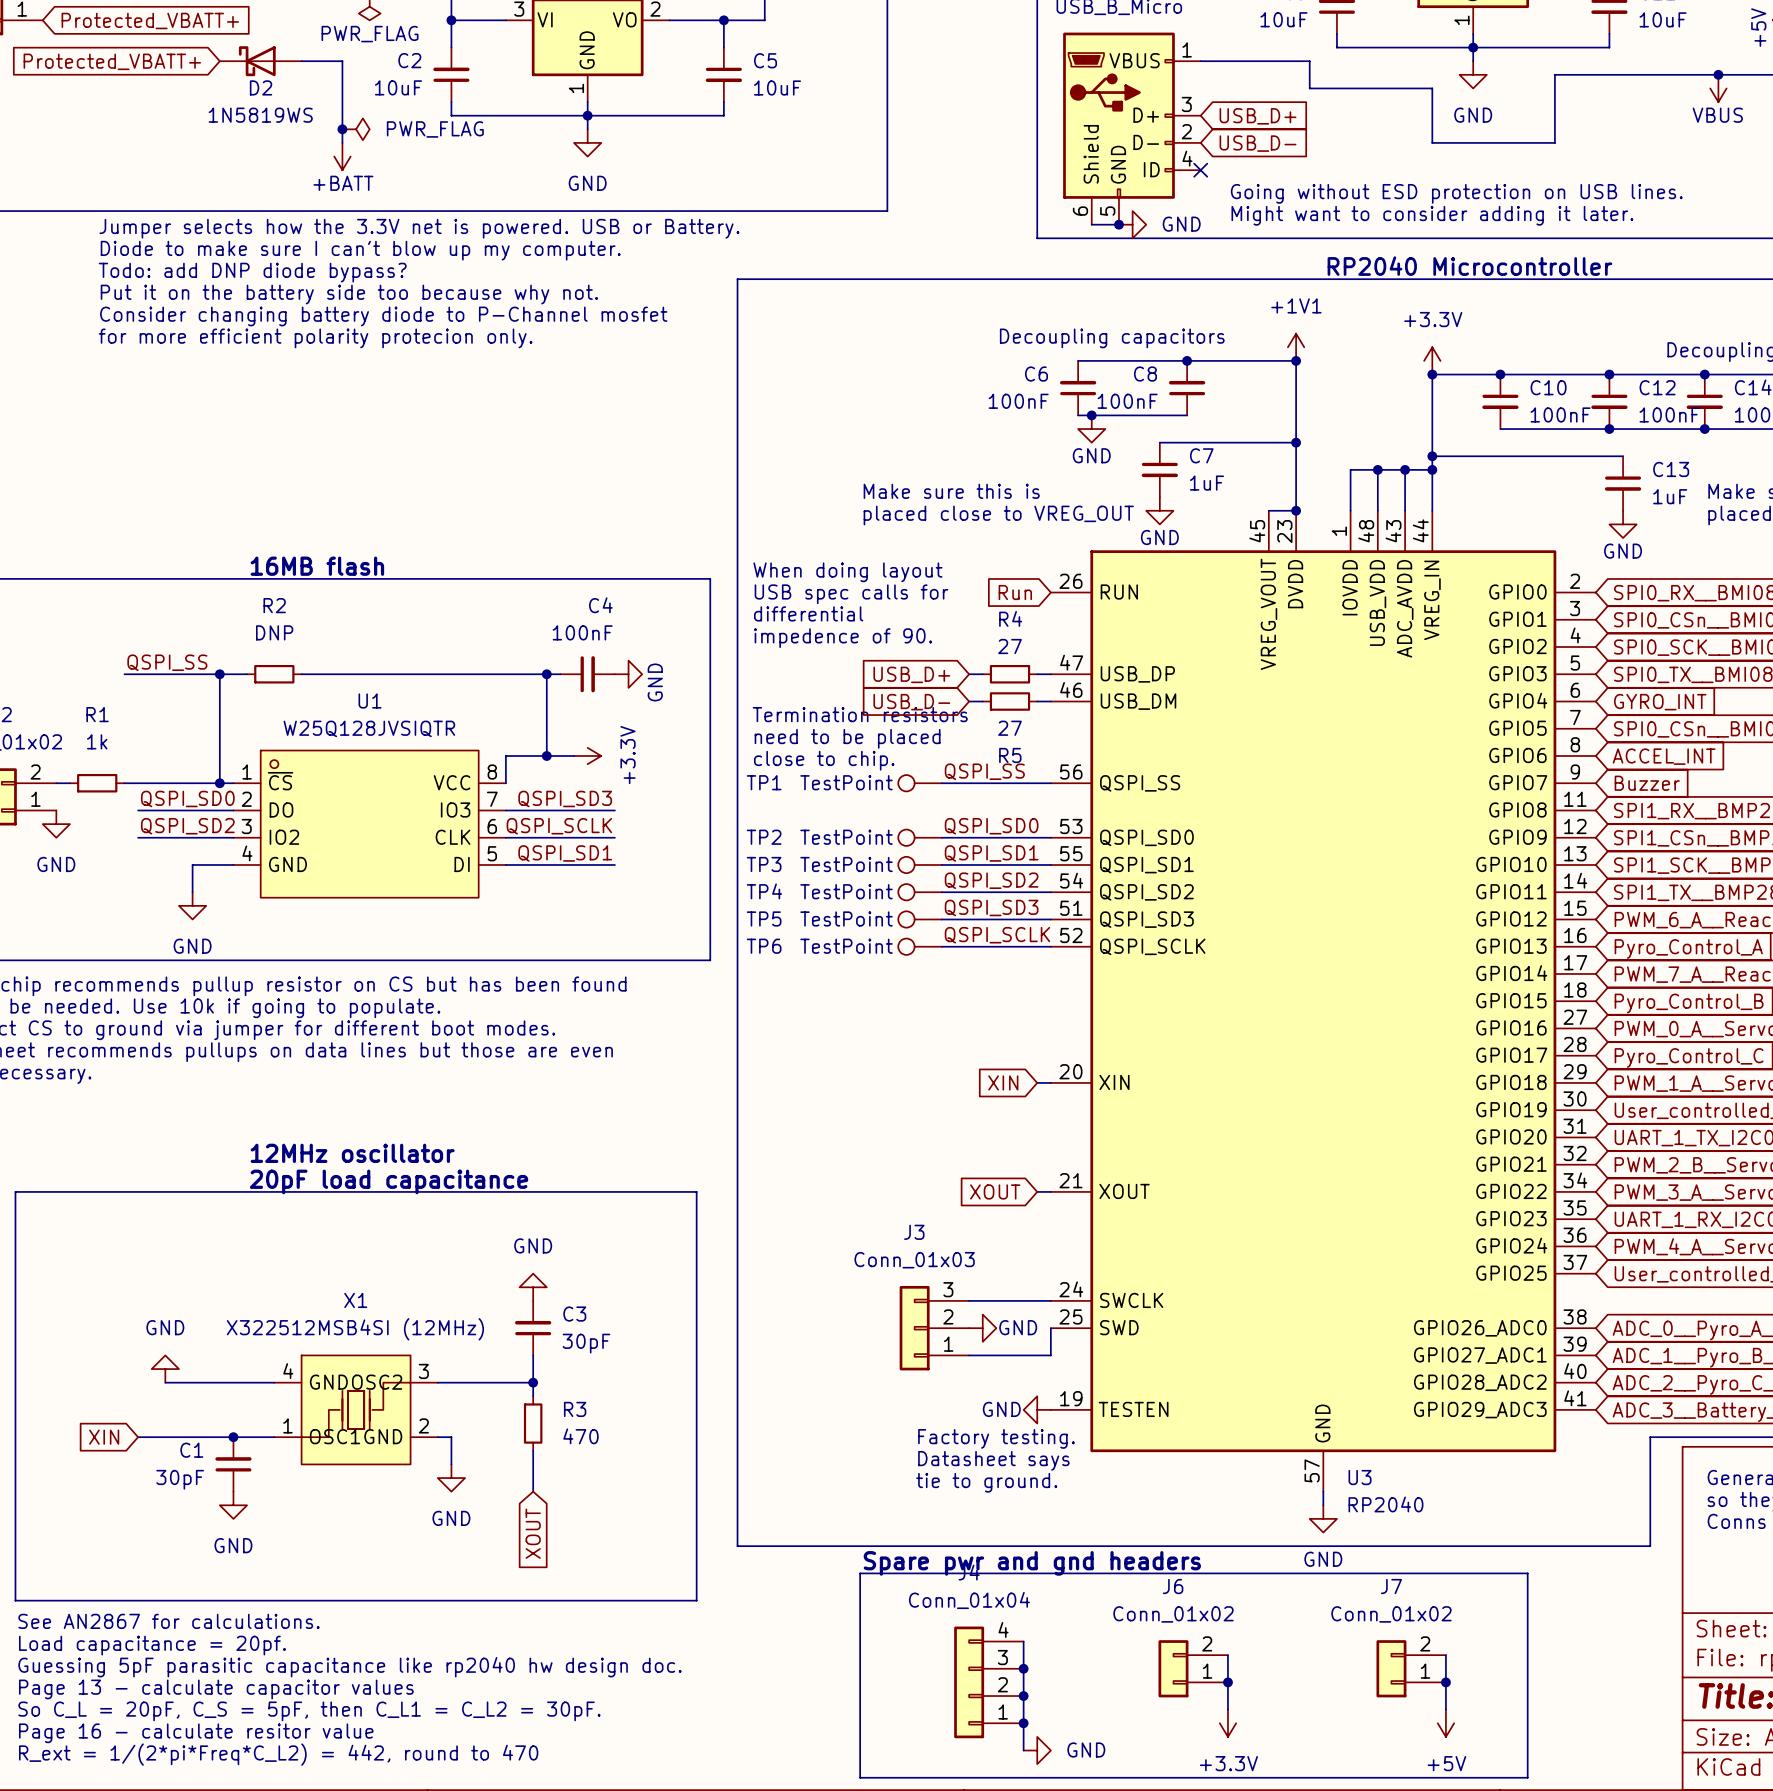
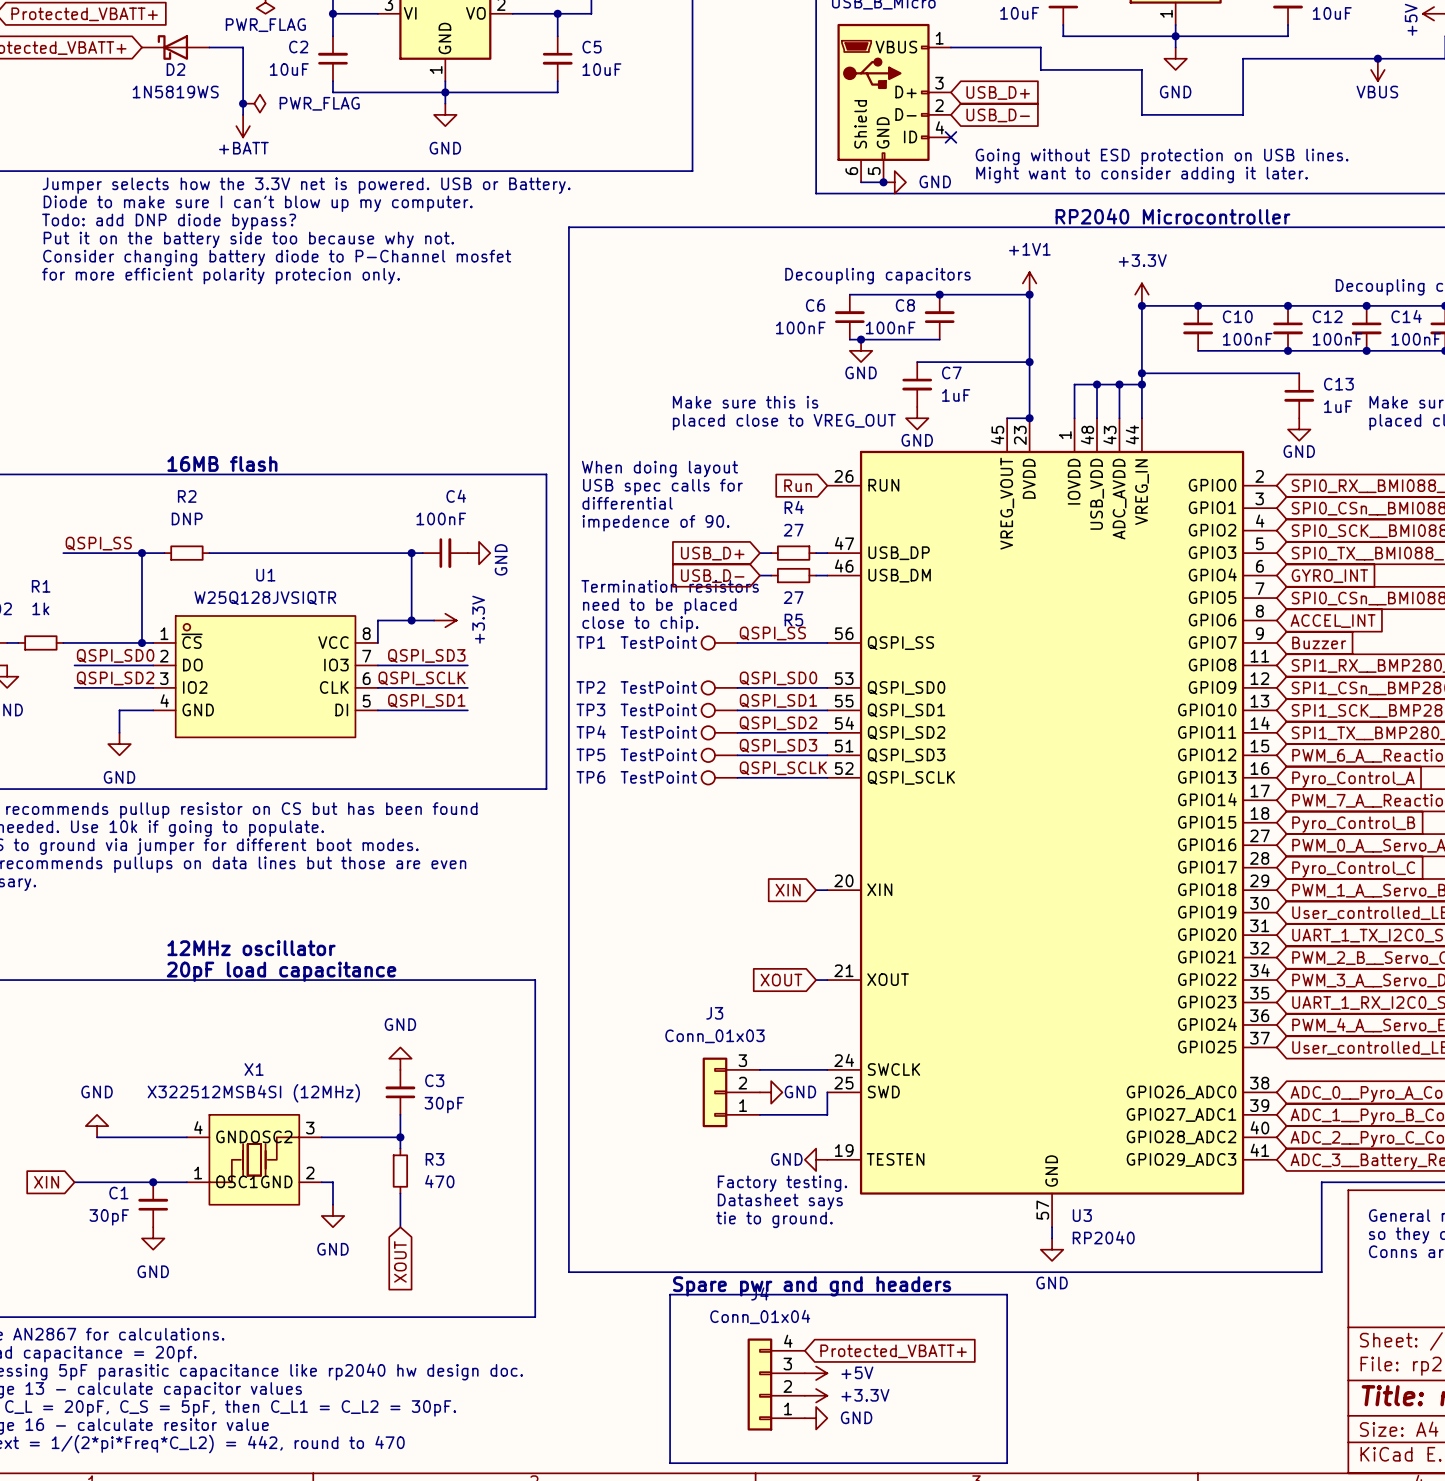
line: (1268, 1573) (1527, 1573) (1527, 1777) (1268, 1777) -> (1007, 1294) (1007, 1463)
wire: (1023, 1641) (1023, 1750) -> none
global label: none -> Protected_VBATT+ (893, 1351)
wire: (1227, 1655) (1227, 1709) -> none
wire: (1445, 1655) (1445, 1709) -> none
junction: (1023, 1668) -> none
power symbol: none -> +5V (816, 1373)
J6: Conn_01x02 (1193, 1668) -> none
J7: Conn_01x02 (1411, 1668) -> none
junction: (1227, 1682) -> none
junction: (1445, 1682) -> none
junction: (1023, 1696) -> none
junction: (1023, 1723) -> none
power symbol rotation: 0° (1227, 1723) -> 90° counterclockwise (816, 1395)
power symbol position: +3.3V (1227, 1723) -> +3.3V (816, 1395)
power symbol: +5V (1445, 1723) -> none
power symbol position: GND (1037, 1750) -> GND (816, 1418)
power symbol text position: +3.3V (1228, 1763) -> +3.3V (865, 1395)

